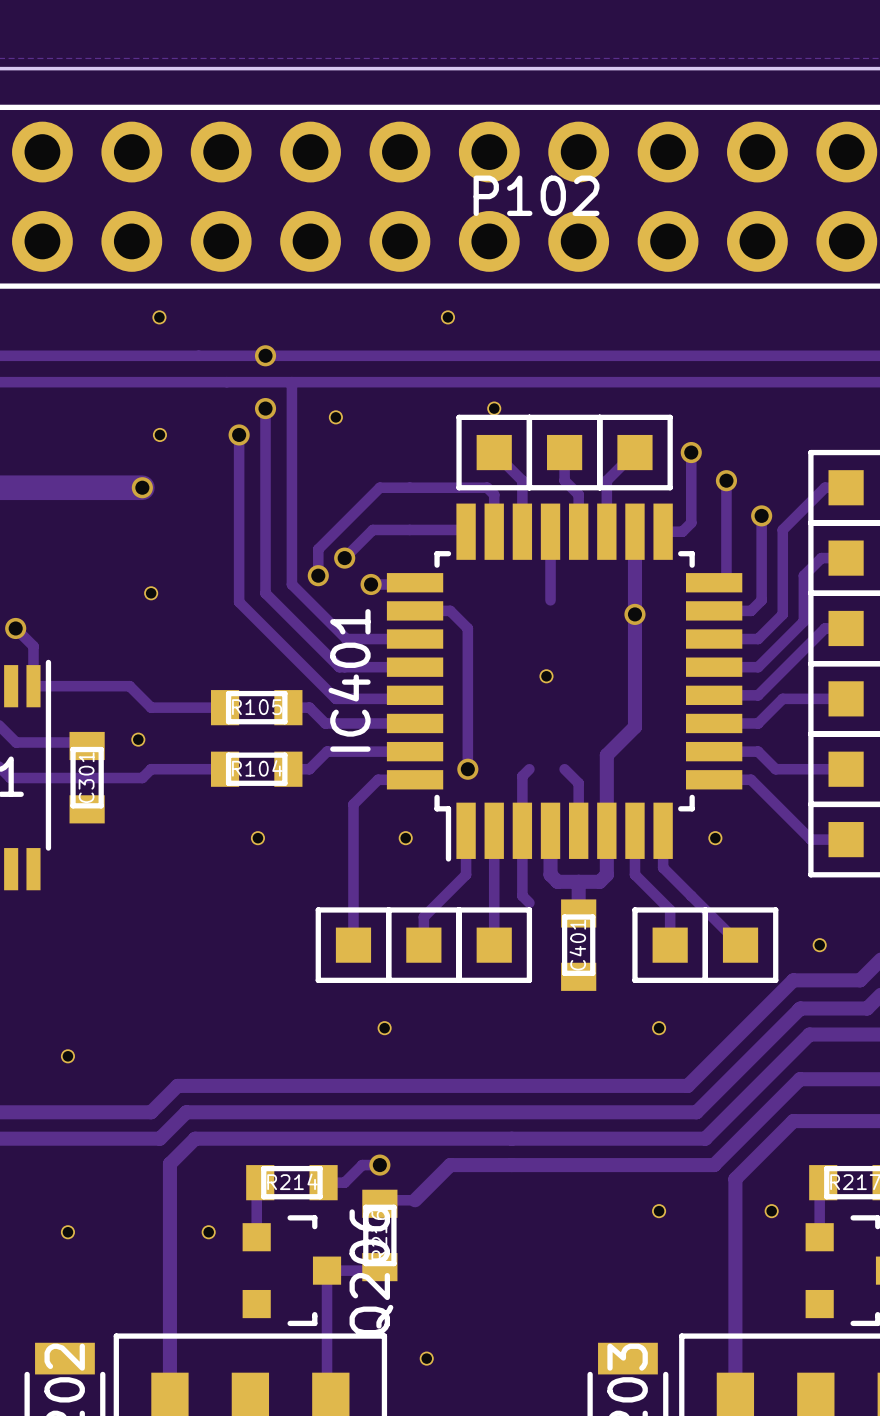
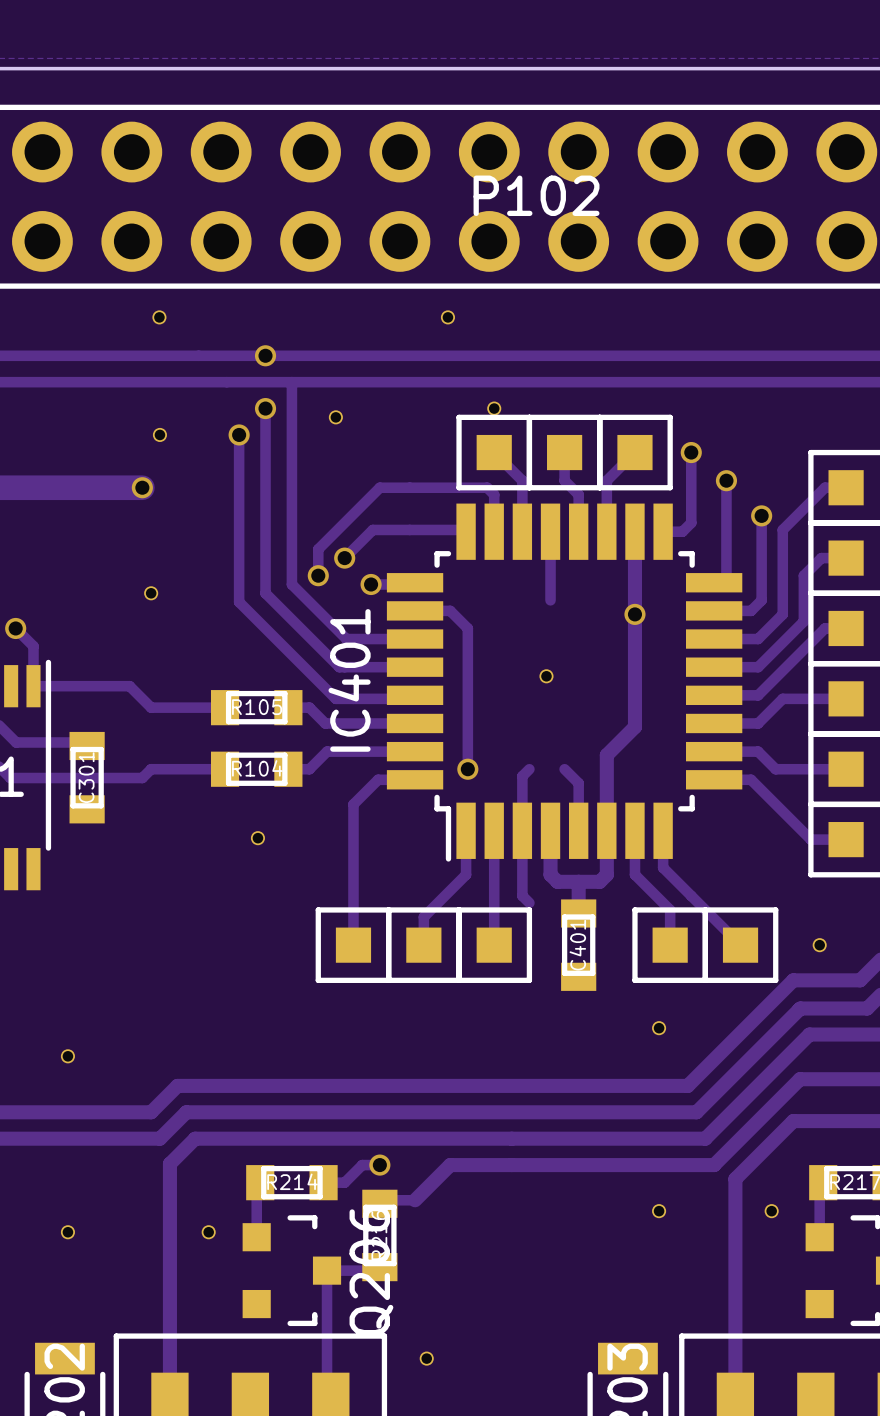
part: (138, 739) -> none
part: (405, 838) -> none
part: (715, 838) -> none
part: (384, 1028) -> none

